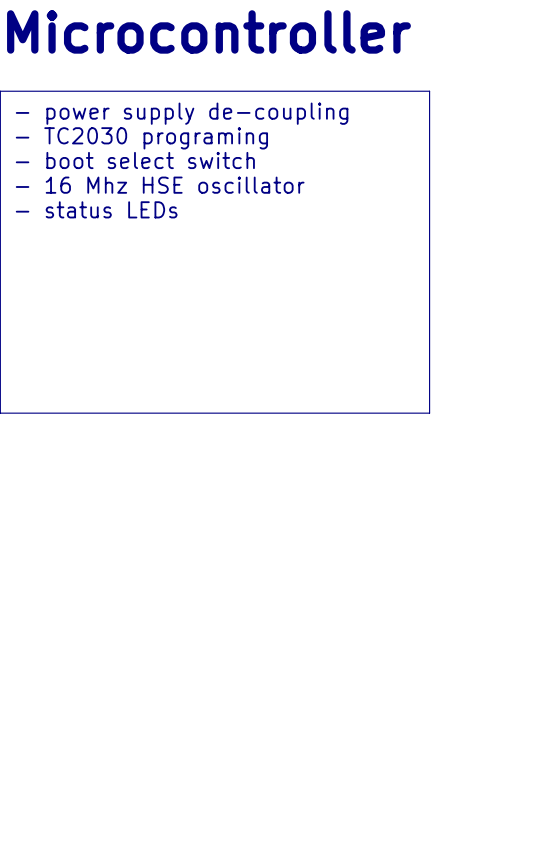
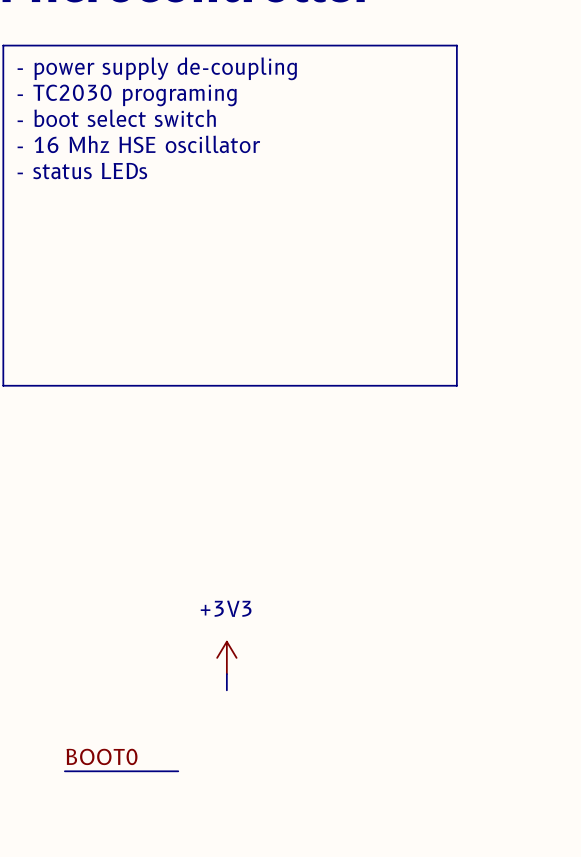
power symbol: none -> +3V3 (226, 657)
wire: none -> (226, 674) (226, 690)
label: none -> BOOT0 (102, 756)
wire: none -> (64, 771) (178, 771)

